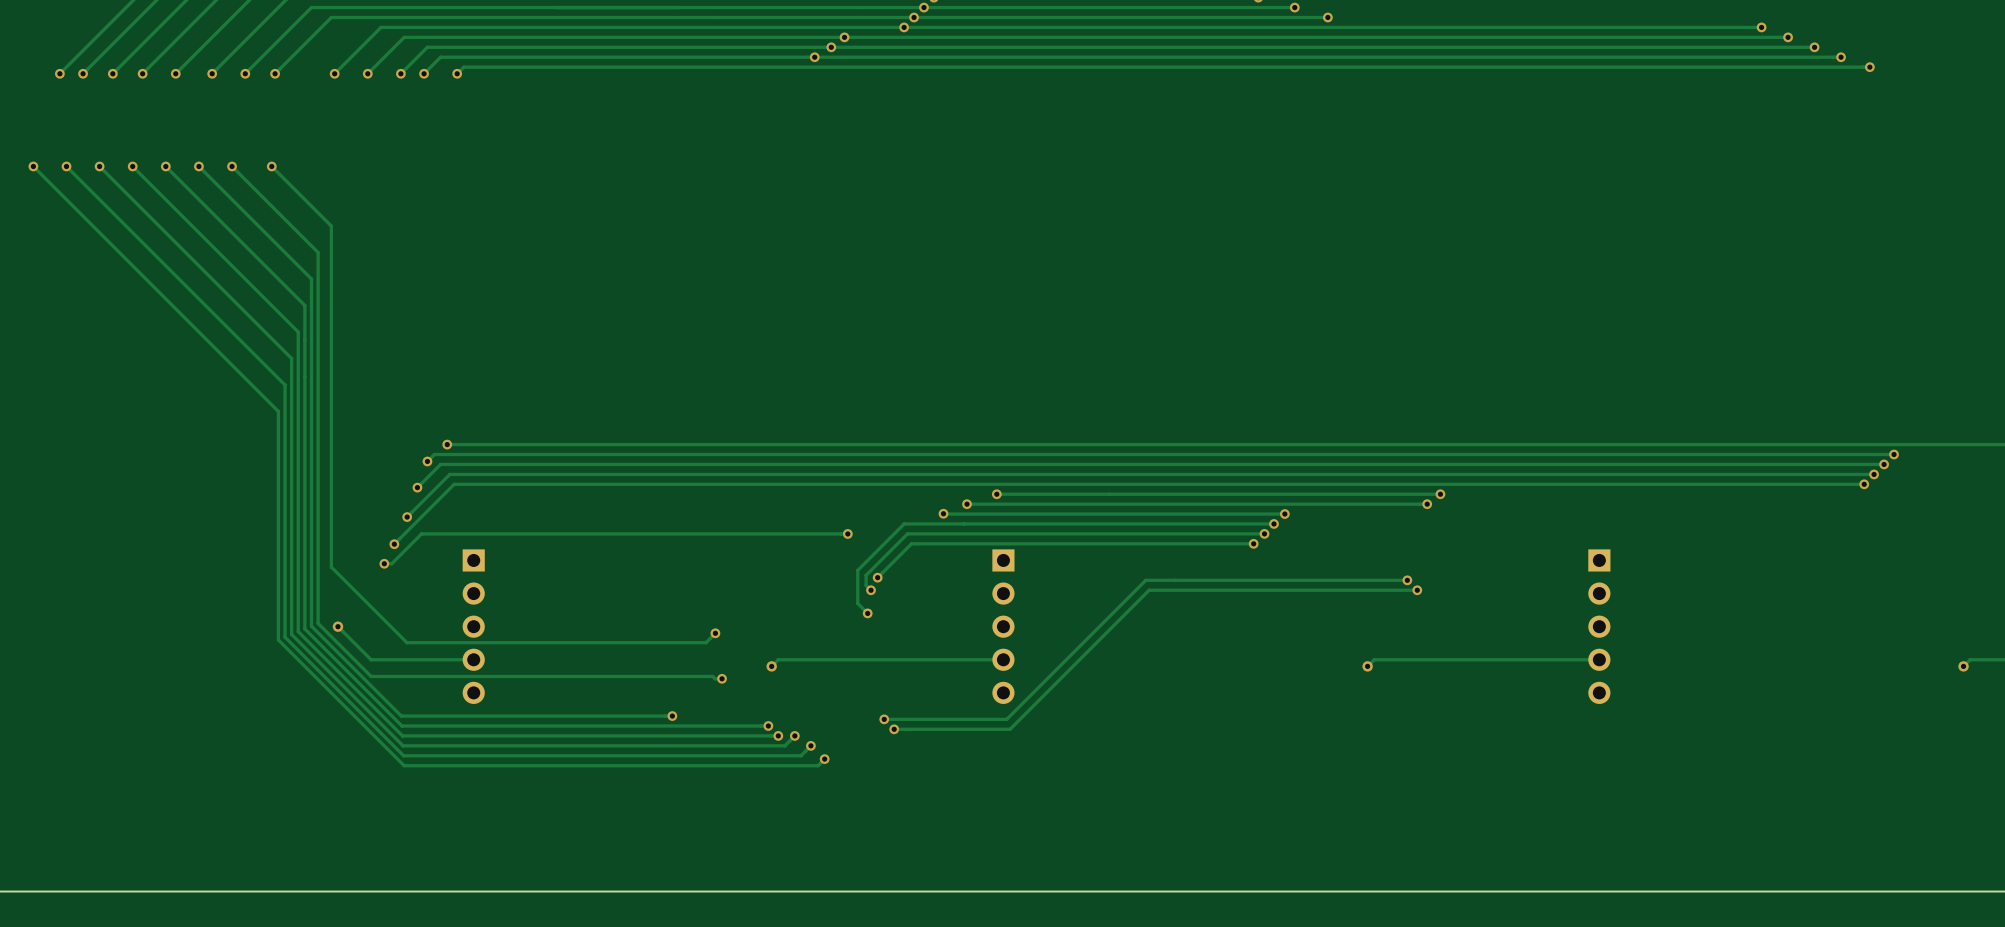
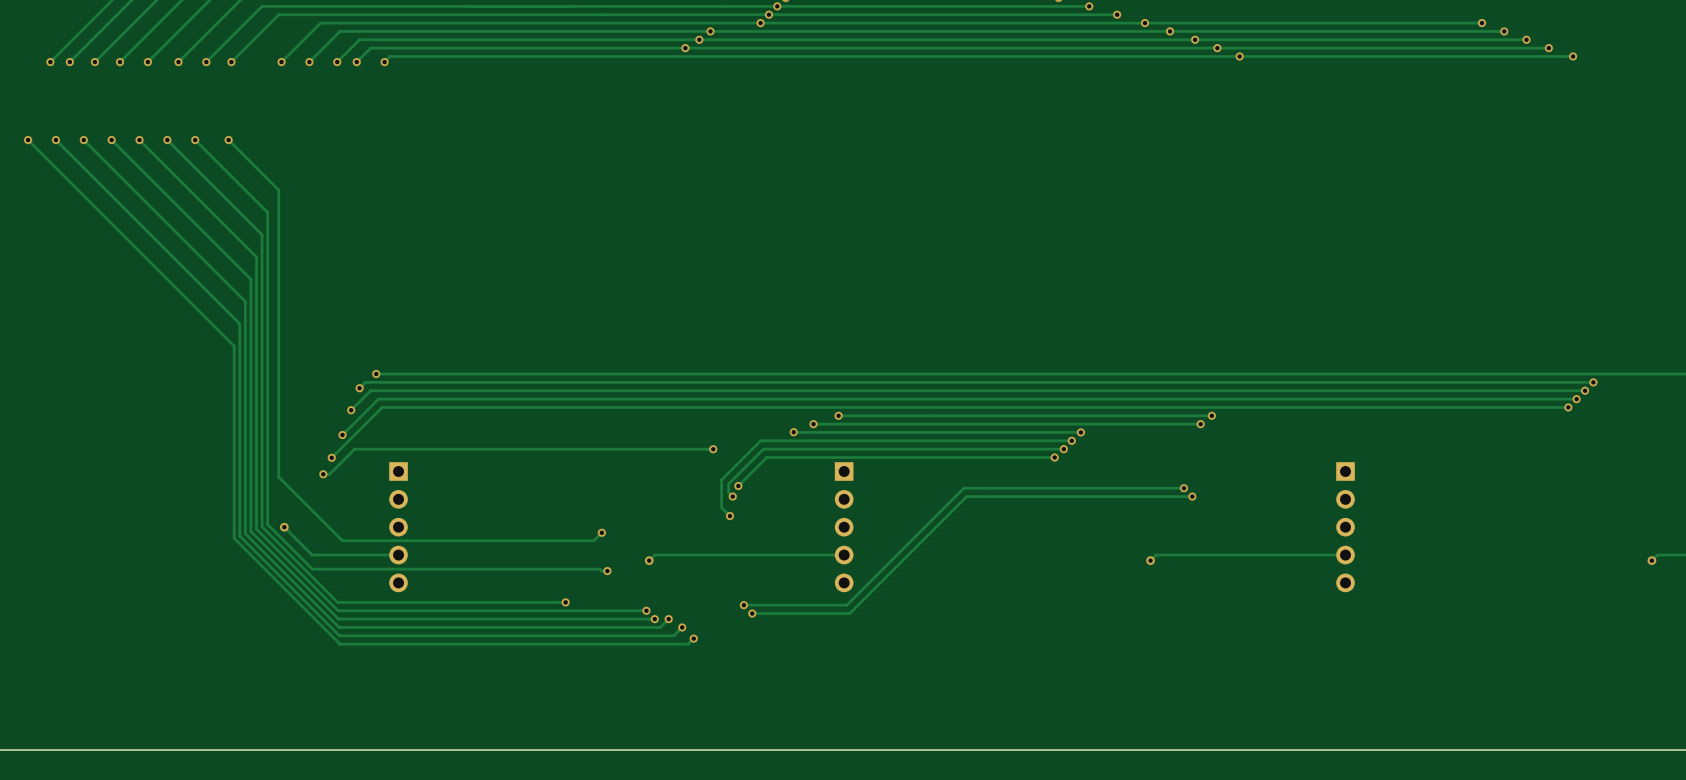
via: none -> (1144, 23)
via: none -> (1170, 31)
via: none -> (1195, 39)
via: none -> (1217, 48)
via: none -> (1239, 56)

